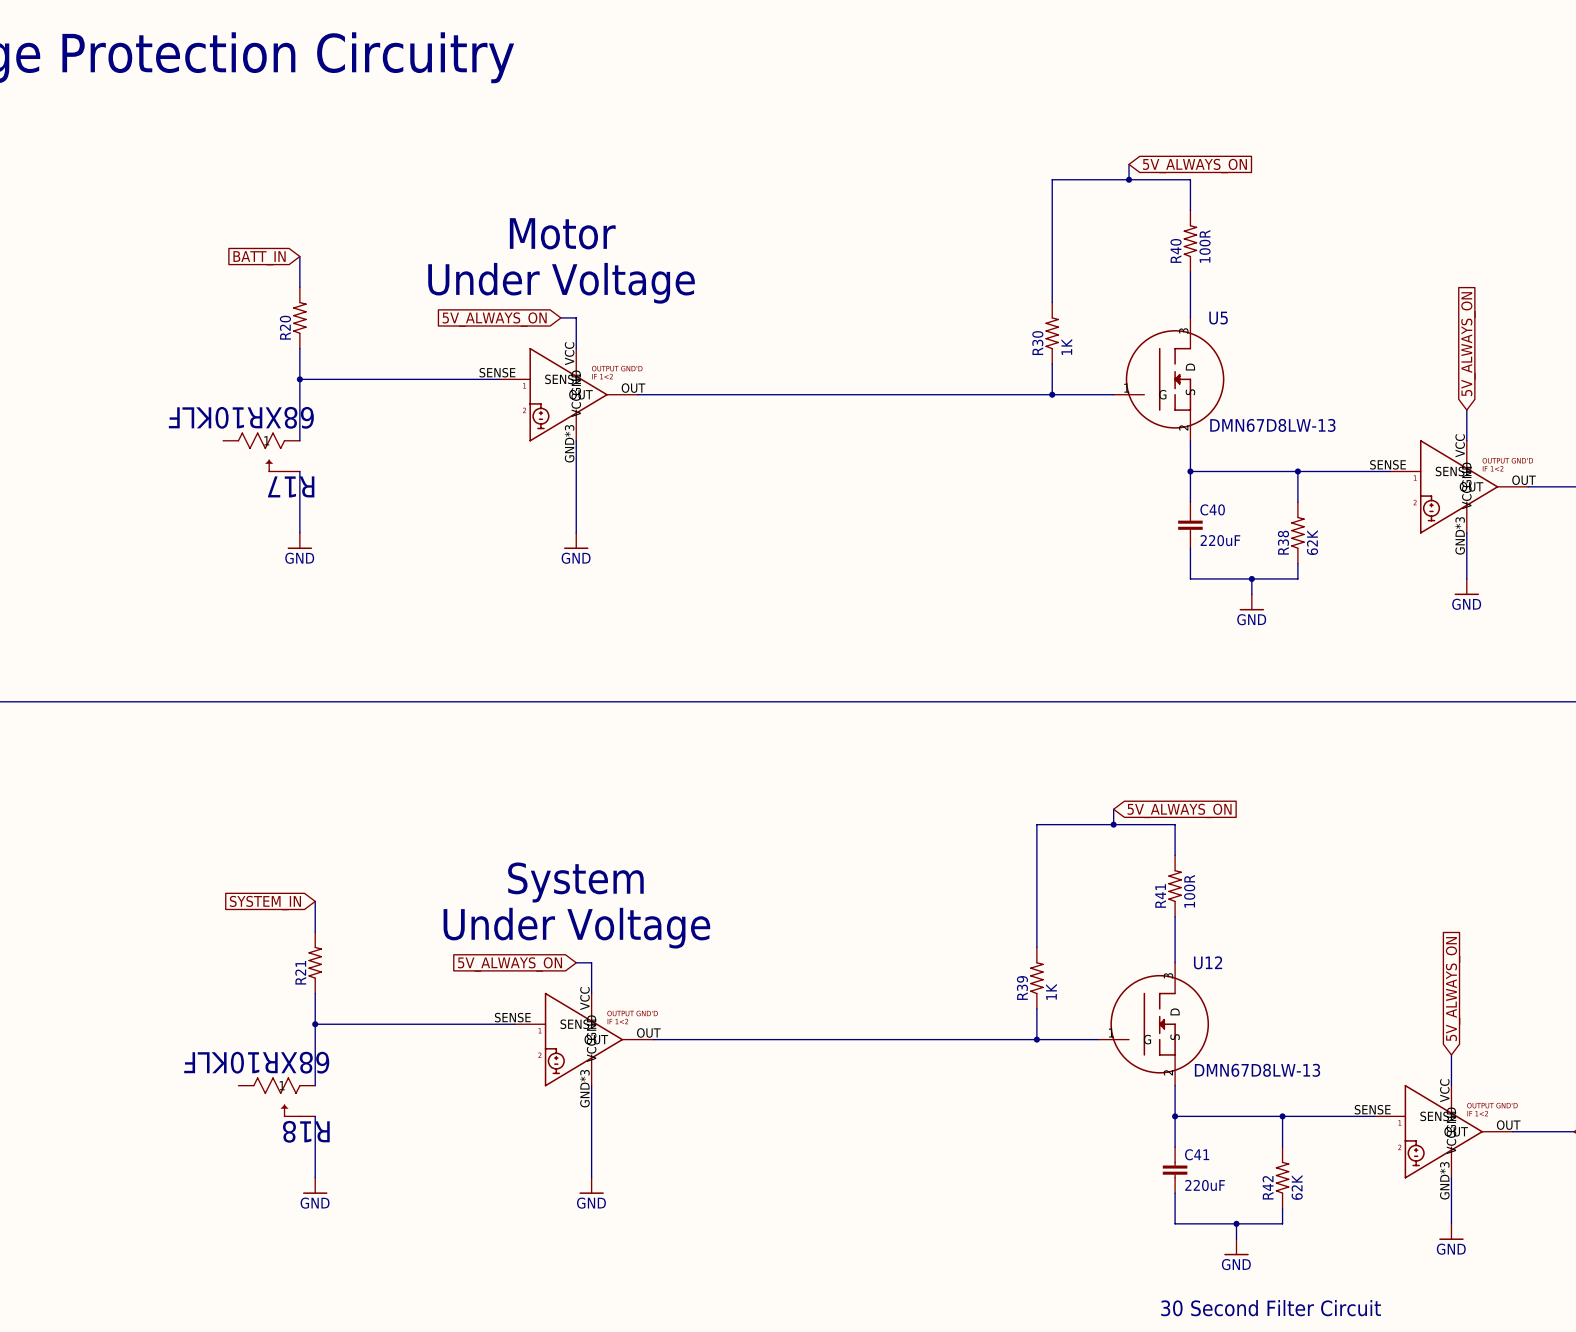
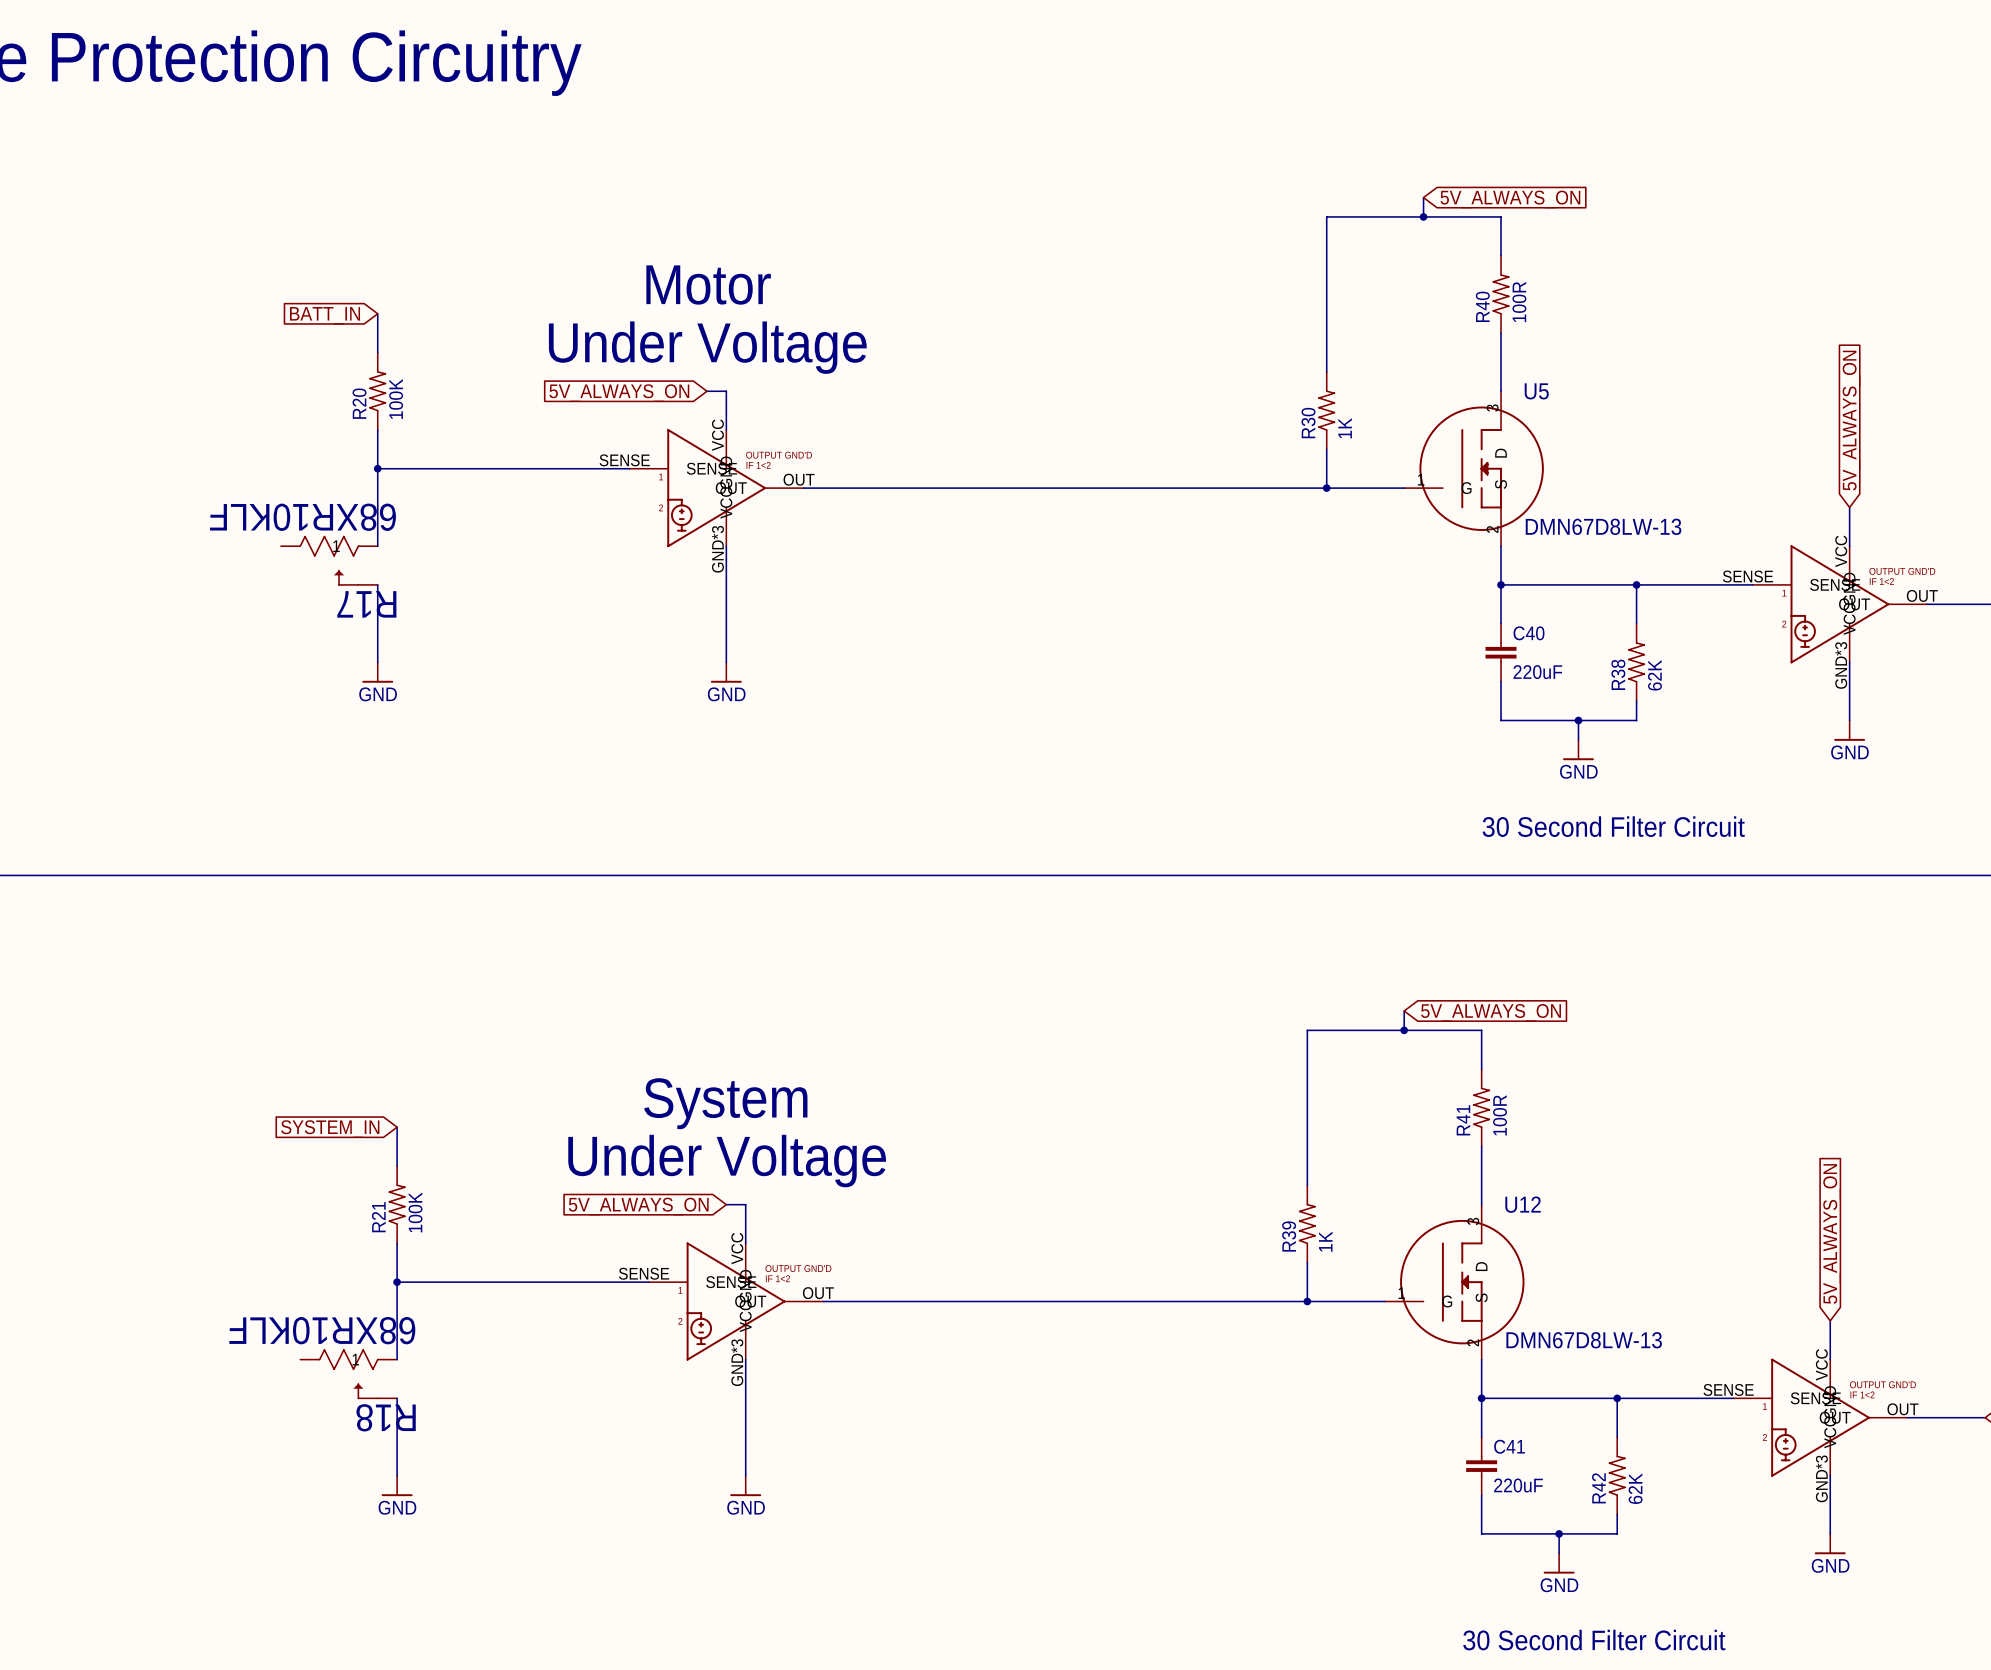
R20 value: none -> 100K (396, 399)
text: none -> 30 Second Filter Circuit (1613, 826)
R21 value: none -> 100K (415, 1212)

